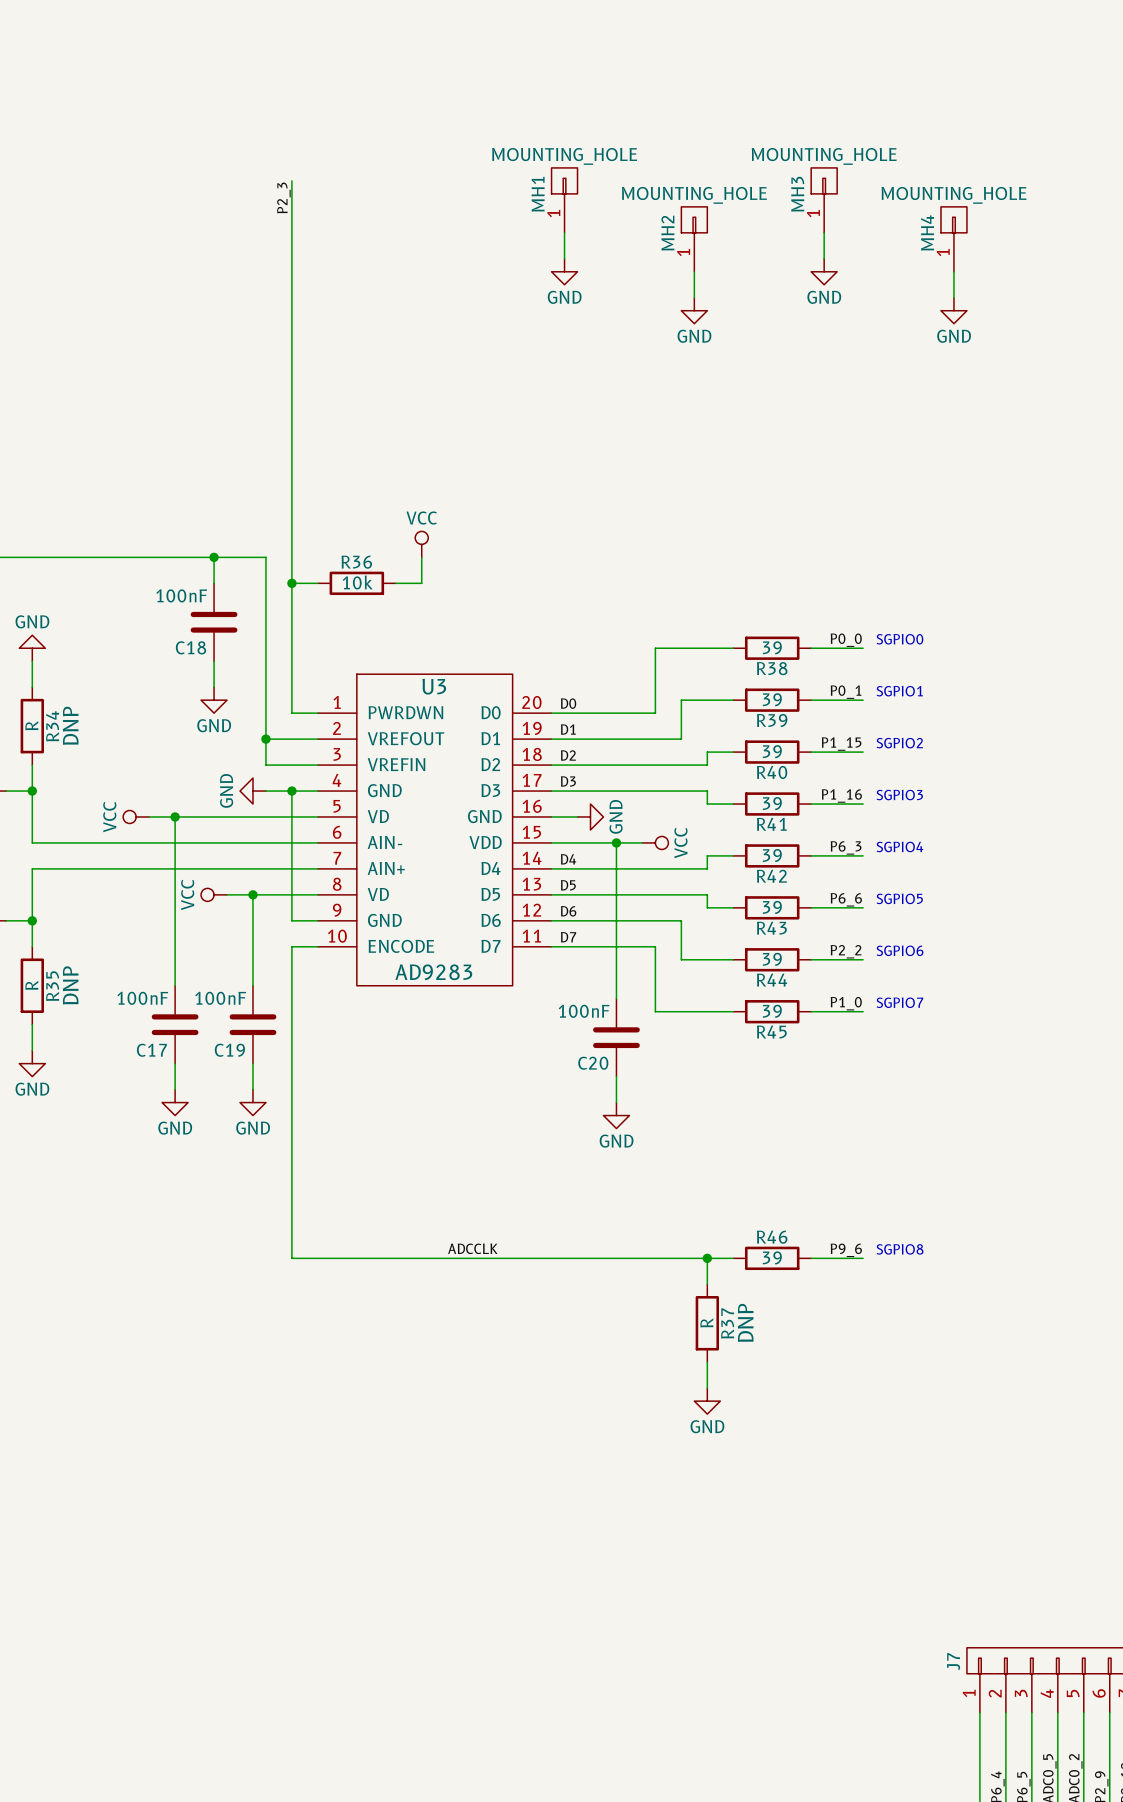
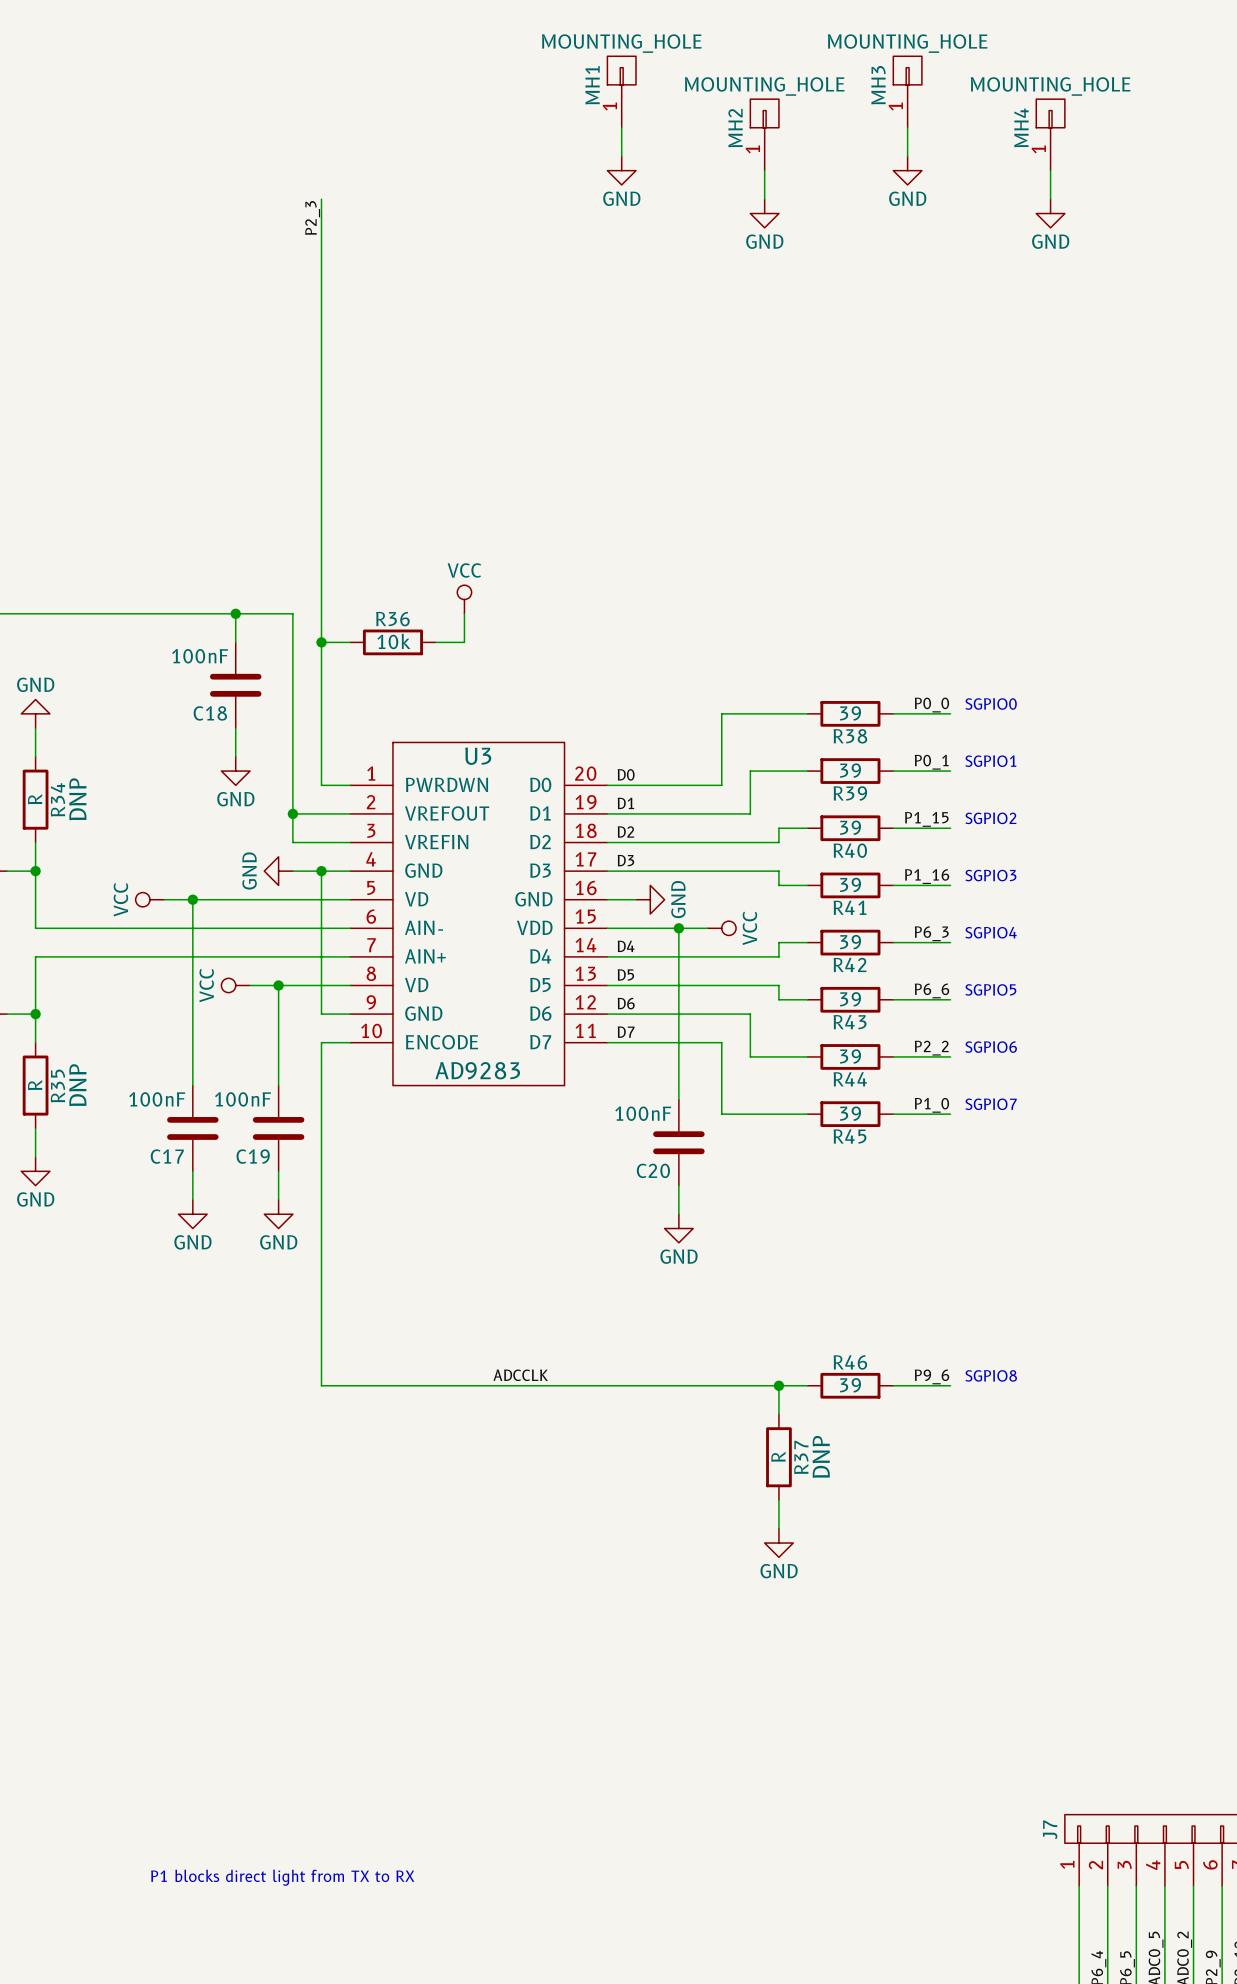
power symbol: none -> GND (621, 170)
power symbol: none -> GND (907, 170)
power symbol: none -> GND (764, 213)
power symbol: none -> GND (1050, 213)
MH1 position: (564, 200) -> (621, 92)
MH3 position: (824, 200) -> (907, 92)
wire: (564, 232) (564, 258) -> (621, 127) (621, 156)
wire: (824, 232) (824, 258) -> (907, 127) (907, 156)
MH2 position: (694, 239) -> (764, 134)
MH4 position: (953, 239) -> (1050, 134)
power symbol: GND (564, 271) -> none
wire: (694, 271) (694, 297) -> (764, 170) (764, 199)
power symbol: GND (824, 271) -> none
wire: (953, 271) (953, 297) -> (1050, 170) (1050, 199)
power symbol: GND (694, 310) -> none
power symbol: GND (953, 310) -> none
text: none -> P1 blocks direct light from TX to RX (282, 1877)

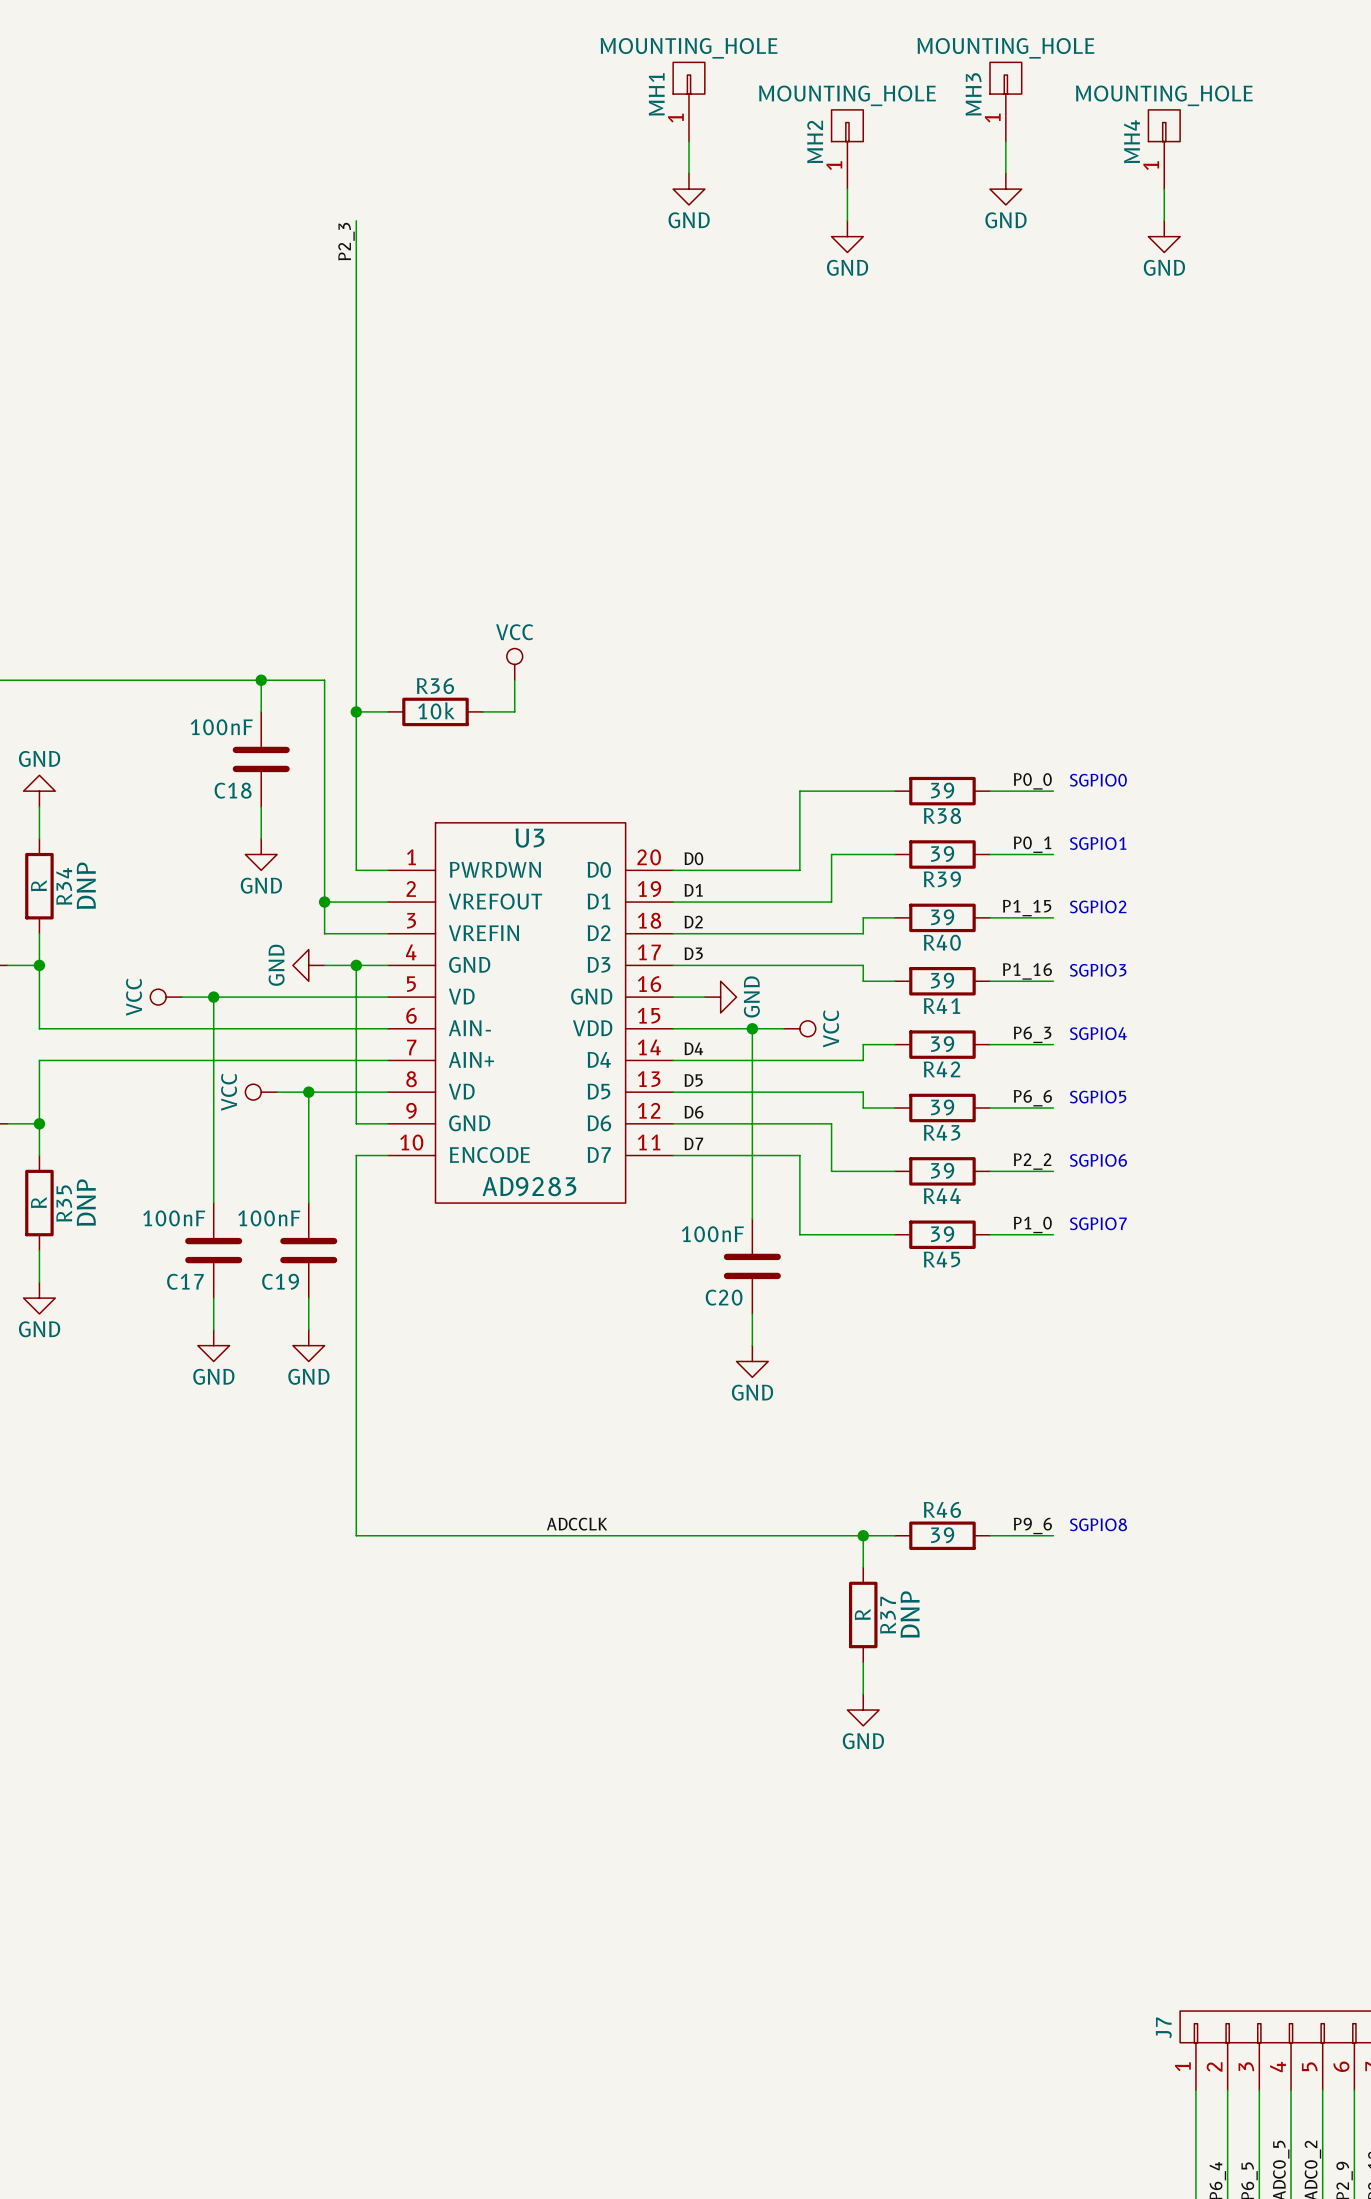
text: P1 blocks direct light from TX to RX (282, 1877) -> none

